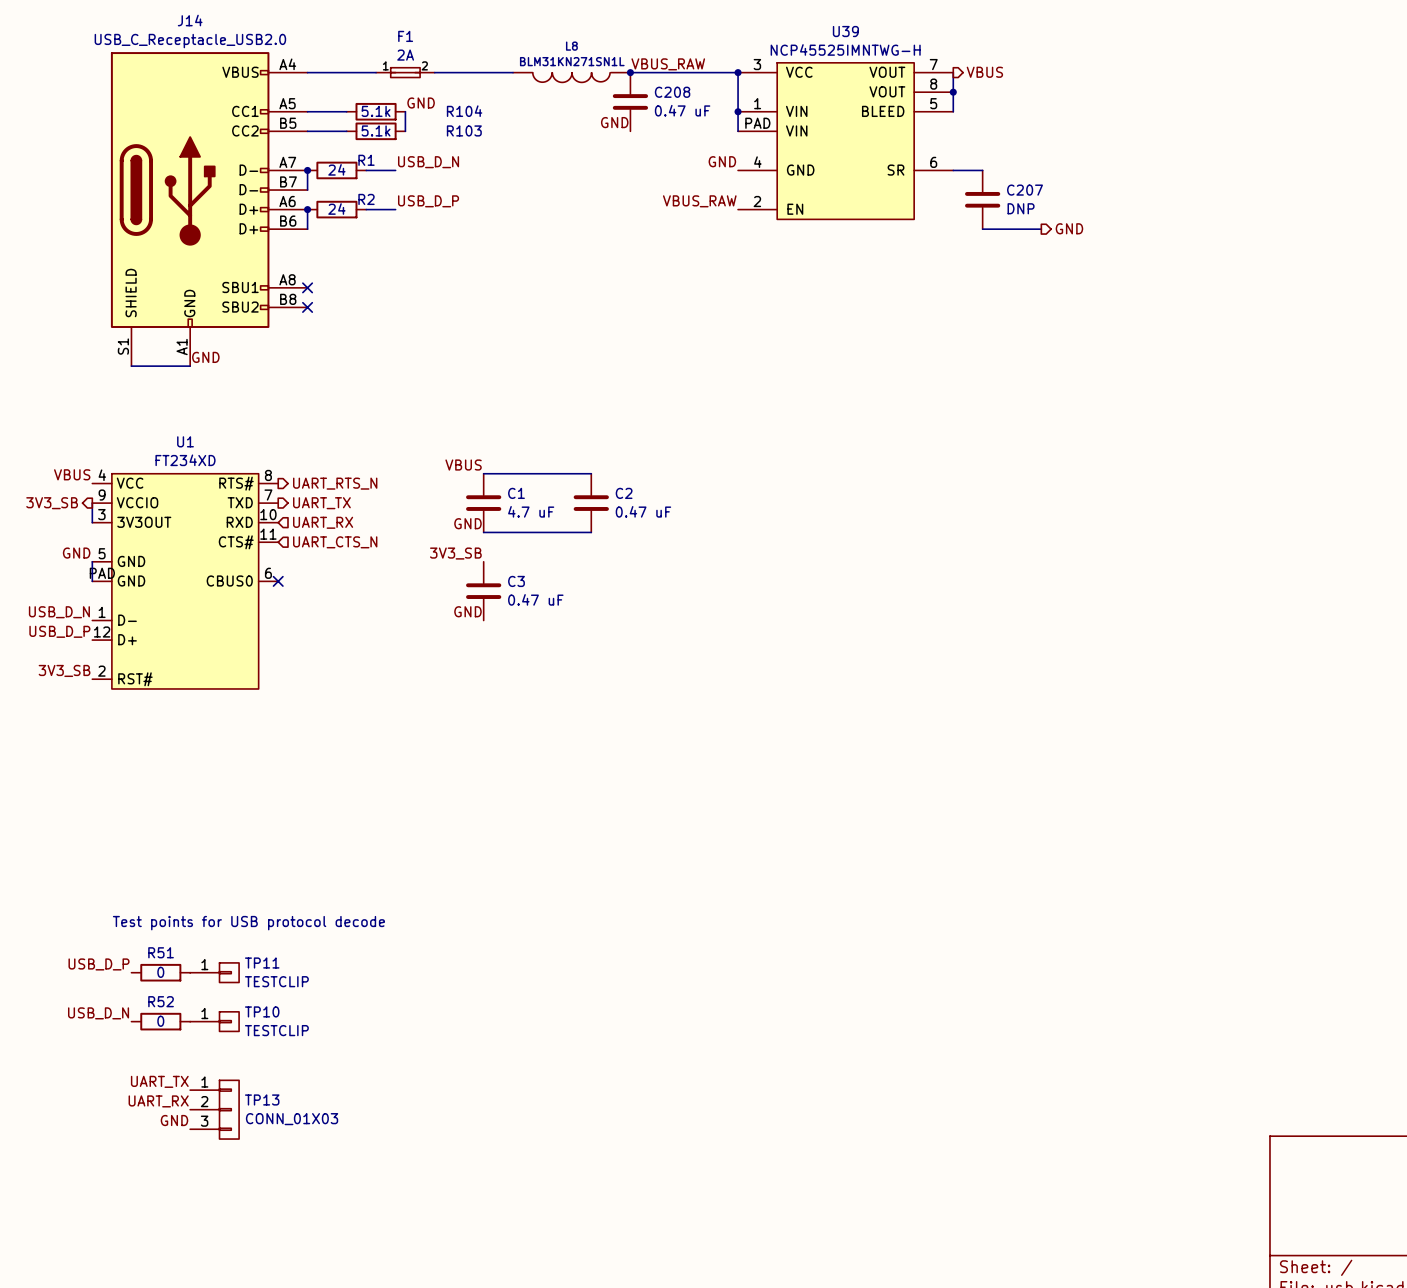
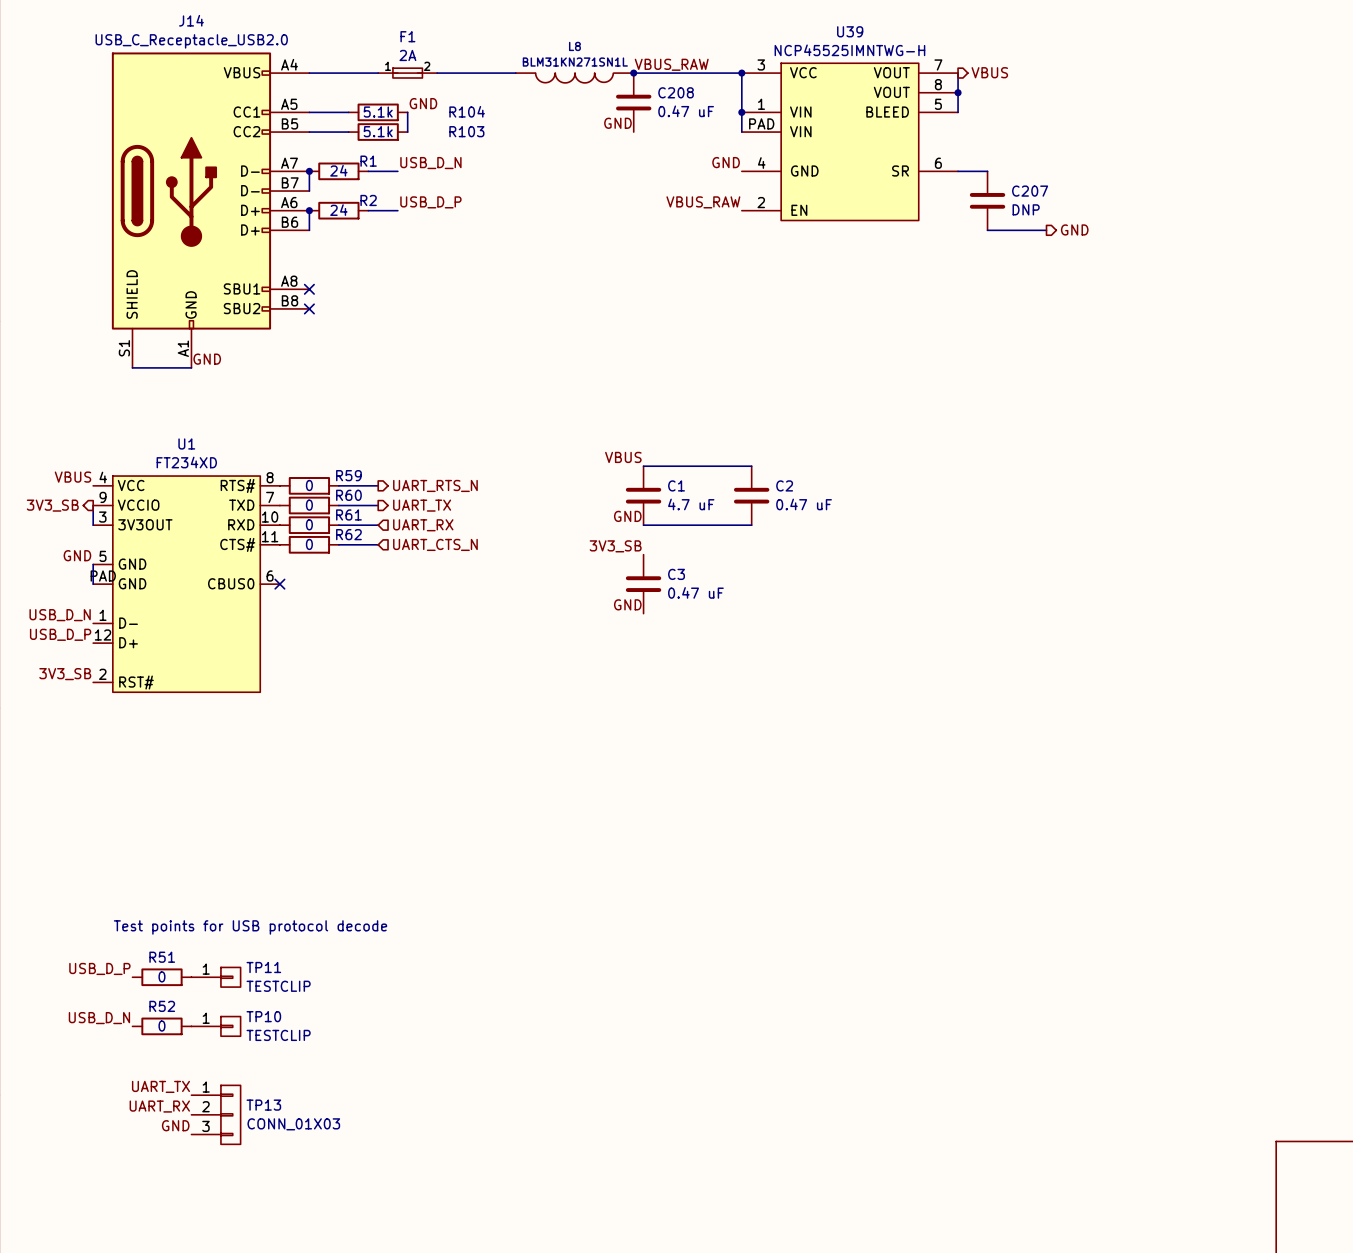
label position: VBUS (463, 465) -> VBUS (623, 457)
wire: (483, 473) (591, 473) -> (643, 466) (751, 466)
R59: none -> 0 (309, 485)
hierarchical label position: UART_RTS_N (335, 483) -> UART_RTS_N (435, 485)
wire: none -> (338, 485) (378, 485)
R60: none -> 0 (309, 505)
hierarchical label position: UART_TX (321, 503) -> UART_TX (422, 505)
wire: none -> (338, 505) (378, 505)
C1 position: (483, 503) -> (643, 495)
C2 position: (591, 503) -> (751, 495)
label: none -> GND (627, 516)
R61: none -> 0 (309, 525)
hierarchical label position: UART_RX (323, 522) -> UART_RX (423, 525)
wire: none -> (338, 525) (378, 525)
label: GND (467, 523) -> none
wire: (483, 532) (591, 532) -> (643, 525) (751, 525)
R62: none -> 0 (309, 544)
hierarchical label position: UART_CTS_N (335, 542) -> UART_CTS_N (435, 544)
wire: none -> (338, 544) (378, 544)
label position: 3V3_SB (455, 553) -> 3V3_SB (615, 546)
C3 position: (483, 591) -> (643, 584)
label: none -> GND (627, 604)
label: GND (467, 611) -> none

